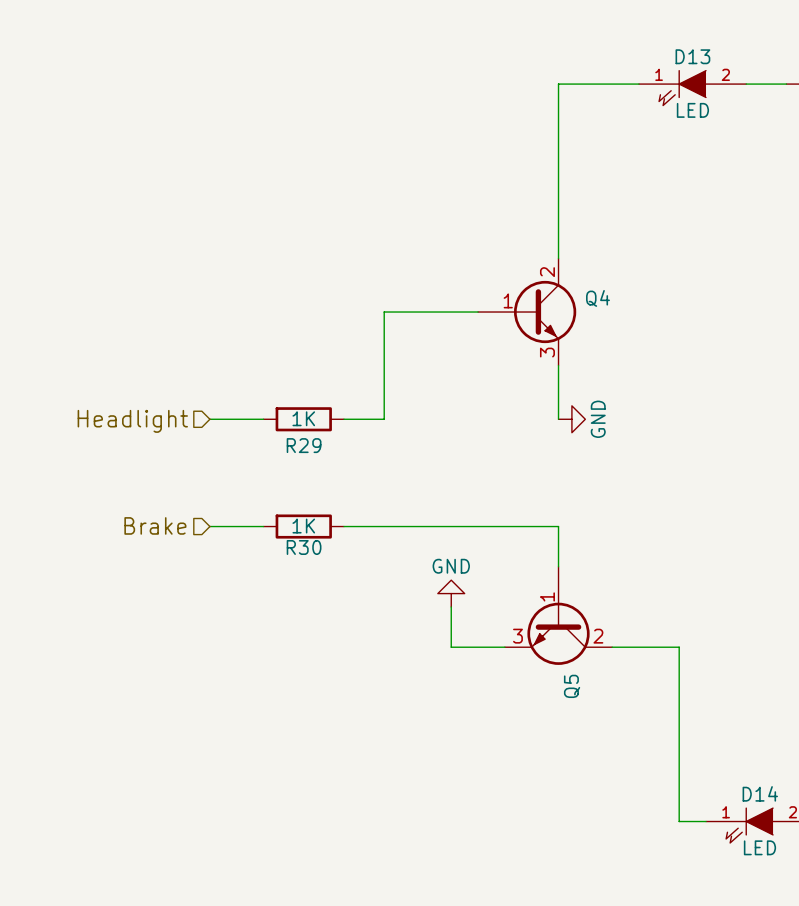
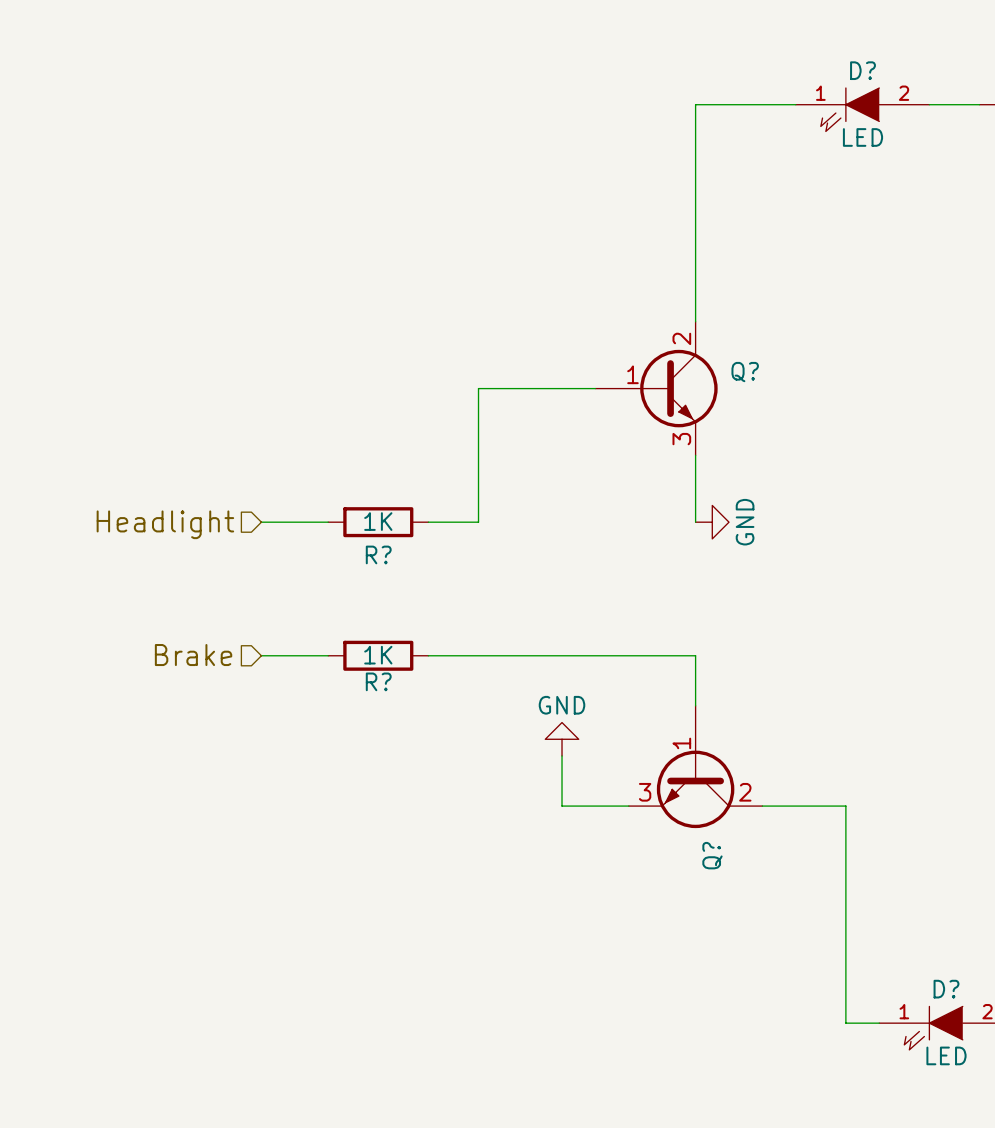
D13 name: D13 (692, 56) -> D? (862, 70)
Q4 name: Q4 (598, 298) -> Q? (745, 372)
R29 name: R29 (304, 445) -> R? (378, 554)
R30 name: R30 (304, 547) -> R? (378, 681)
Q5 name: Q5 (572, 686) -> Q? (712, 855)
D14 name: D14 (760, 793) -> D? (946, 989)

